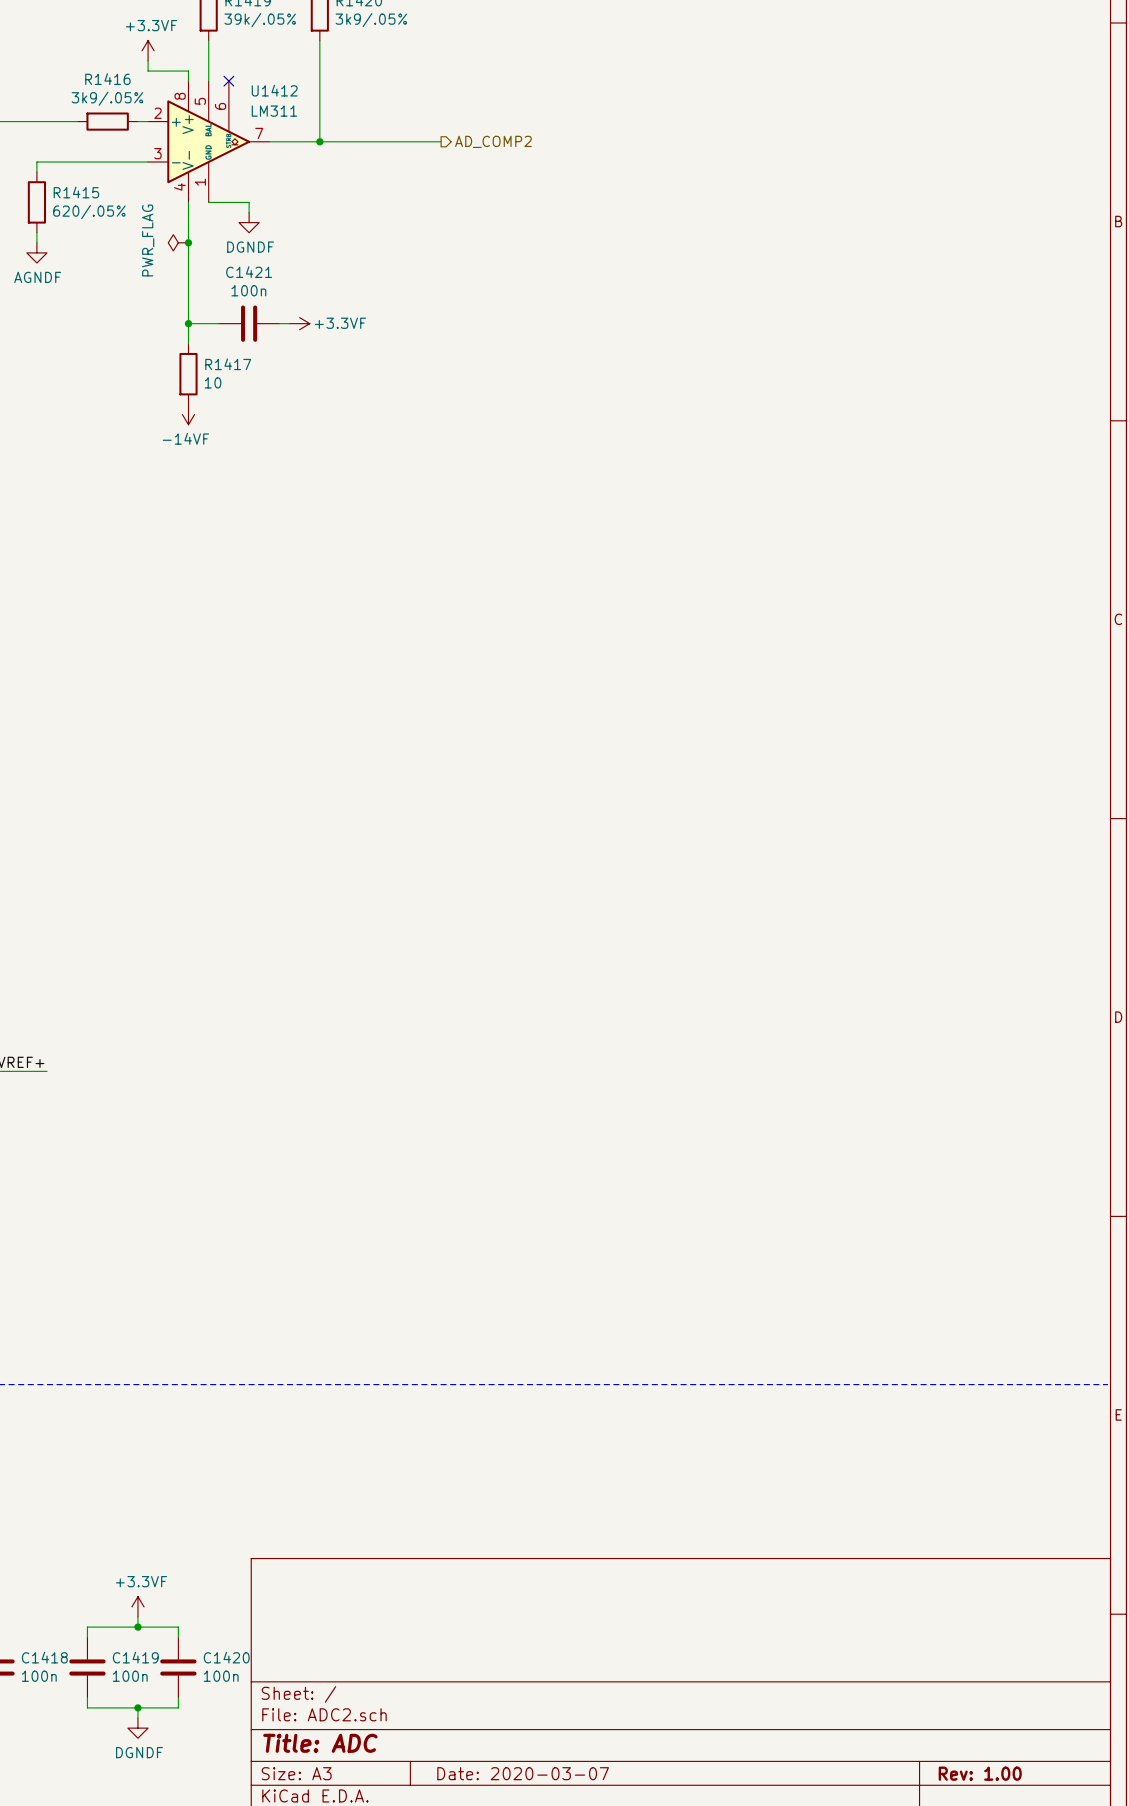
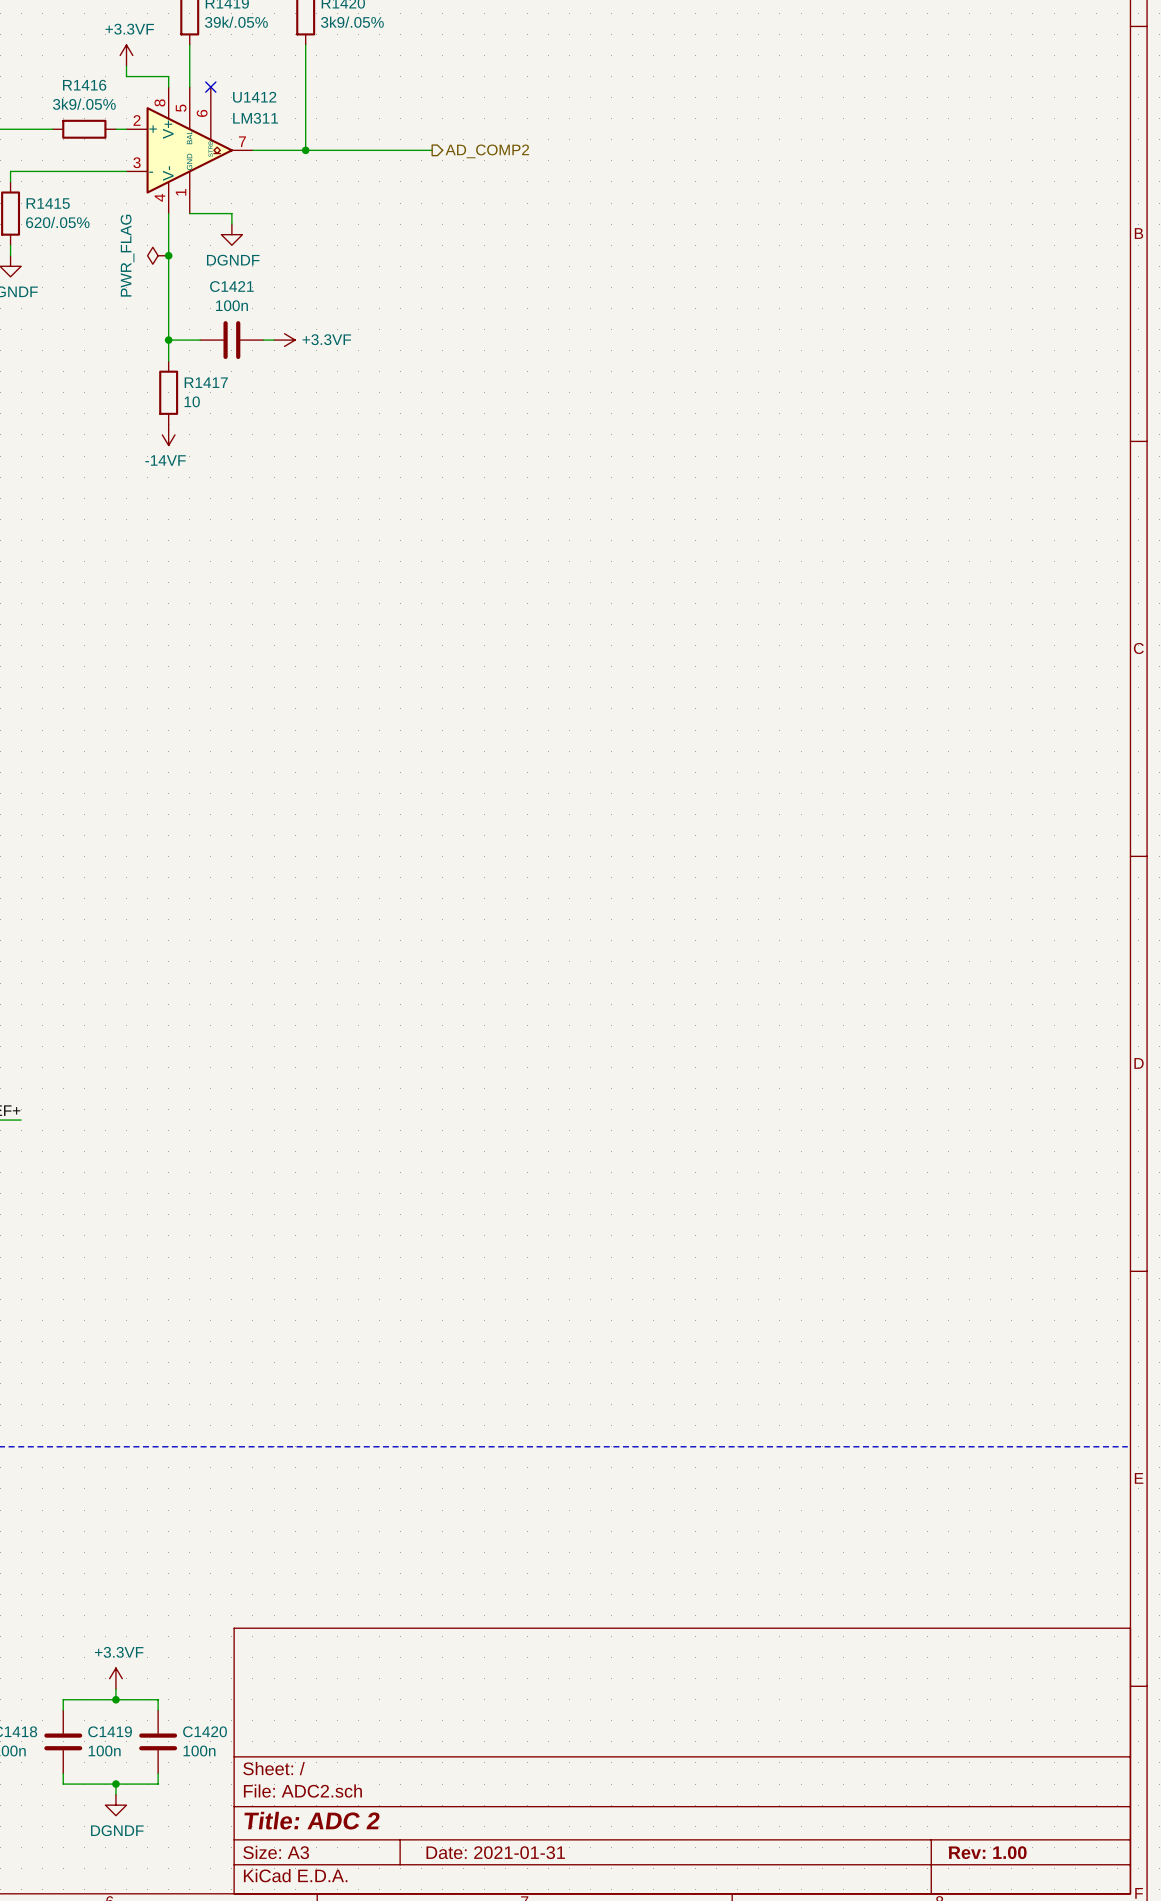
title block: Title: ADC (320, 1743) -> Title: ADC 2 (312, 1820)
title block: Date: 2020-03-07 (523, 1773) -> Date: 2021-01-31 (495, 1852)

